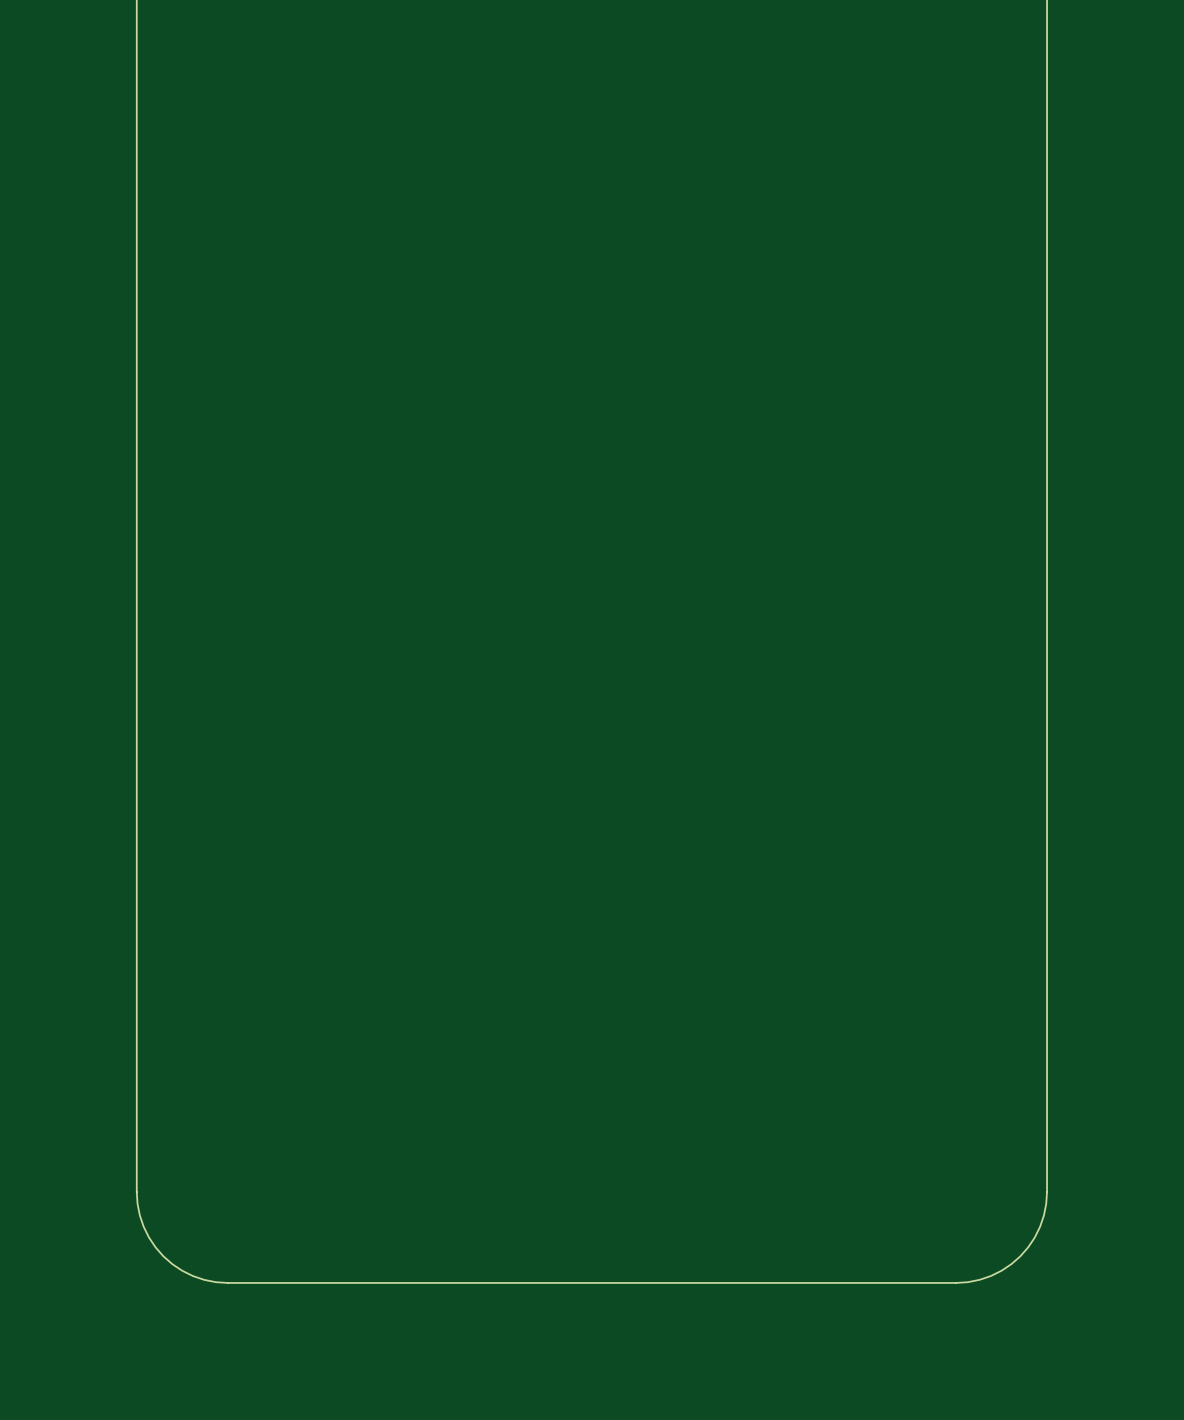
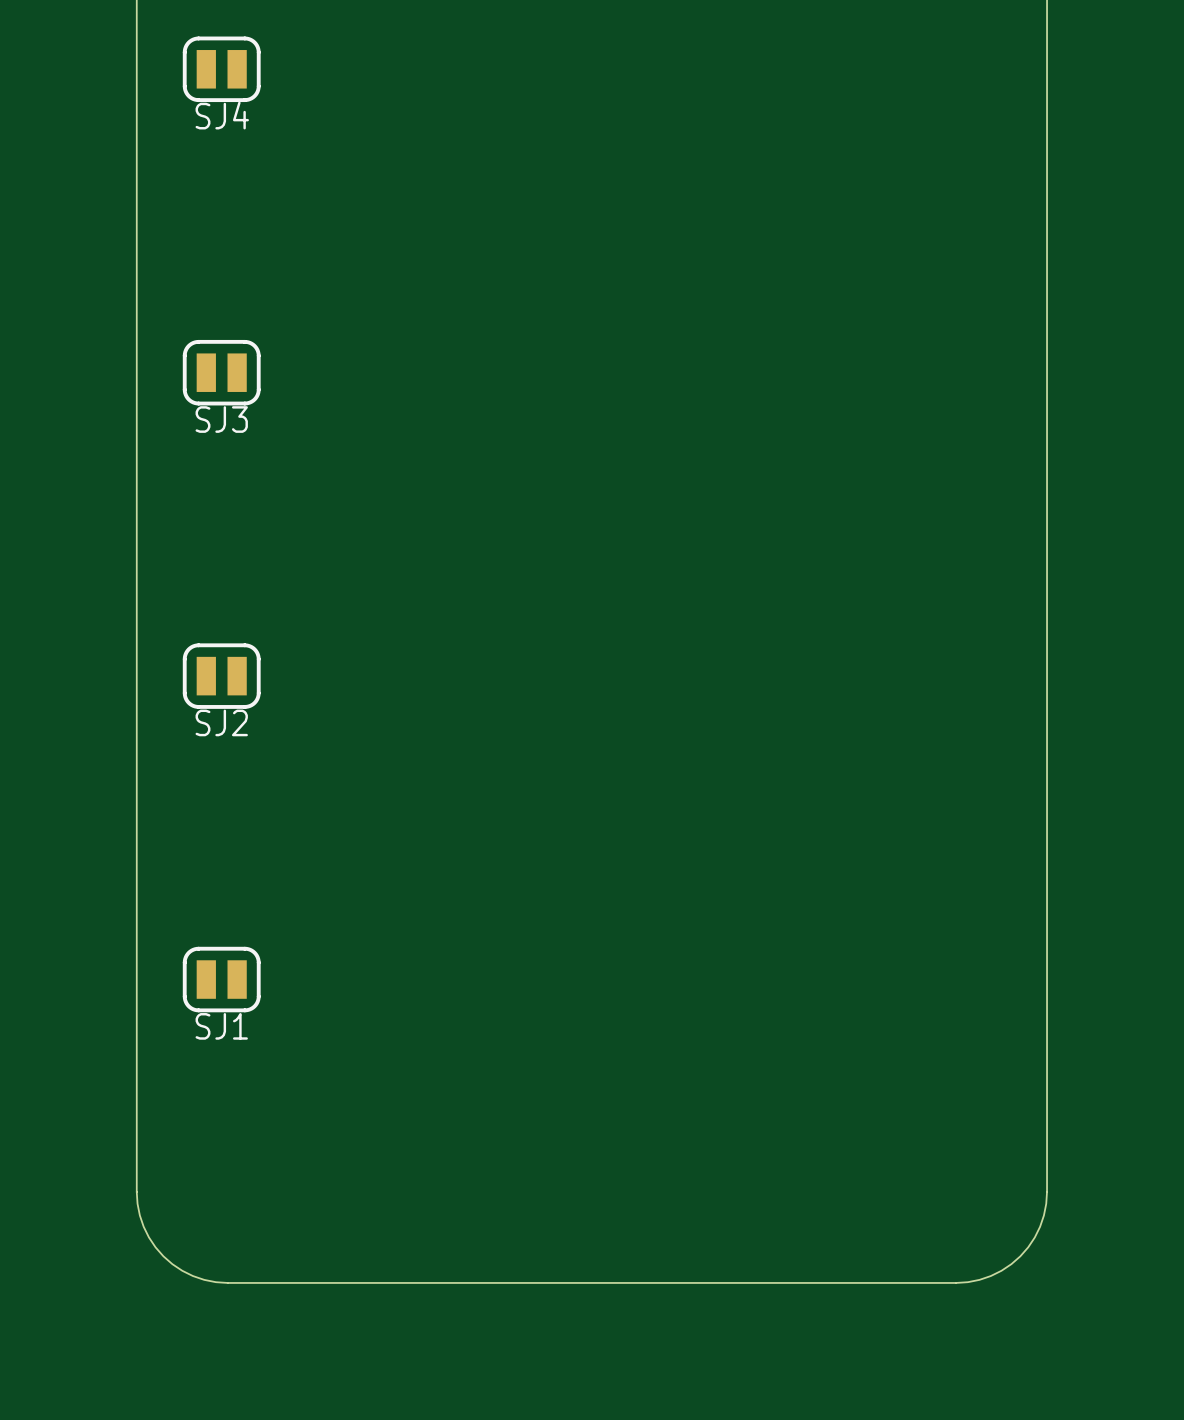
SJ4: none -> (221, 69)
SJ3: none -> (221, 372)
SJ2: none -> (221, 676)
SJ1: none -> (221, 979)

